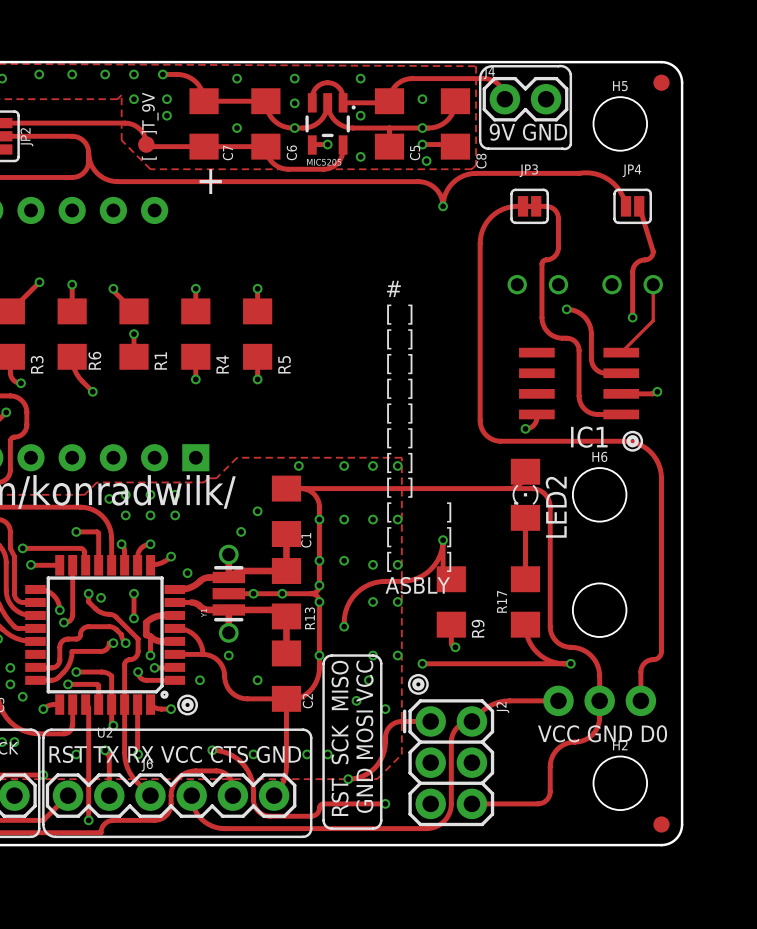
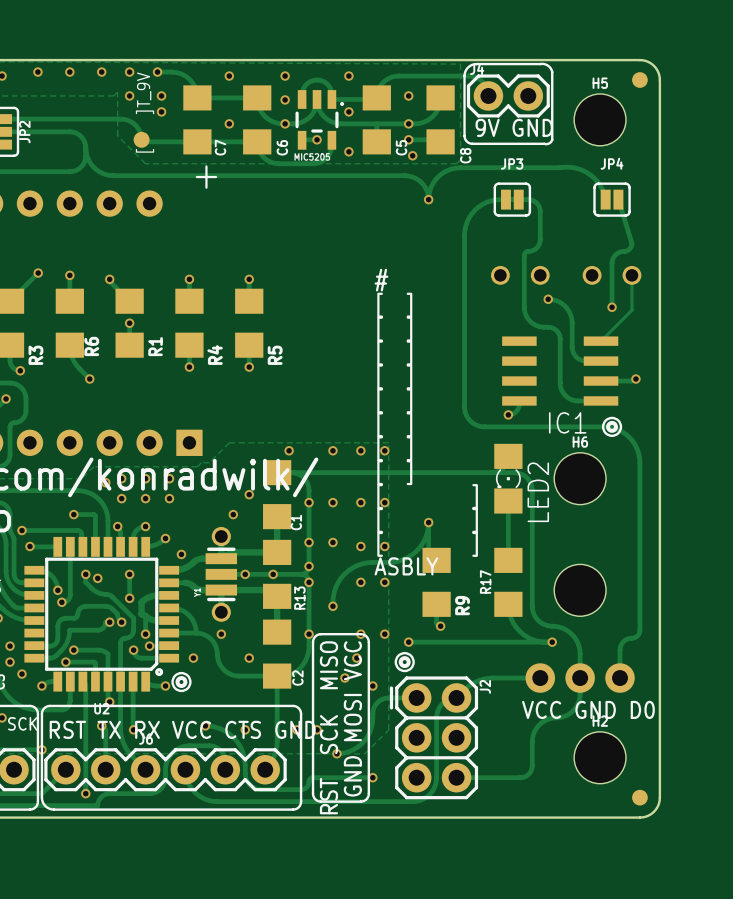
via: (14, 742) -> none
via: (76, 754) -> none

